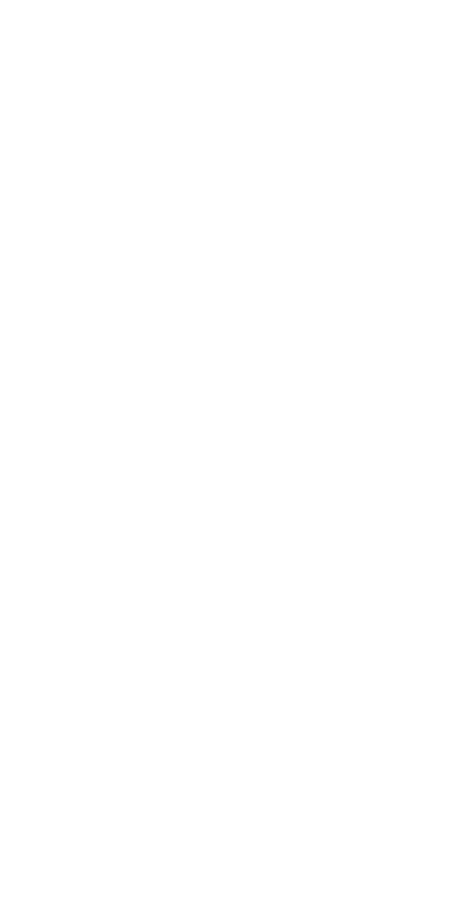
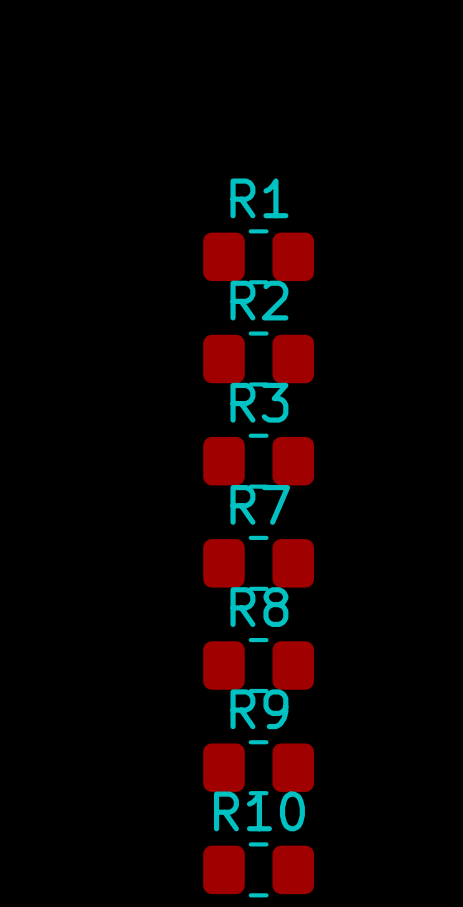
R1: none -> (258, 256)
R2: none -> (258, 359)
R3: none -> (258, 461)
R7: none -> (258, 563)
R8: none -> (258, 665)
R9: none -> (258, 767)
R10: none -> (258, 869)

